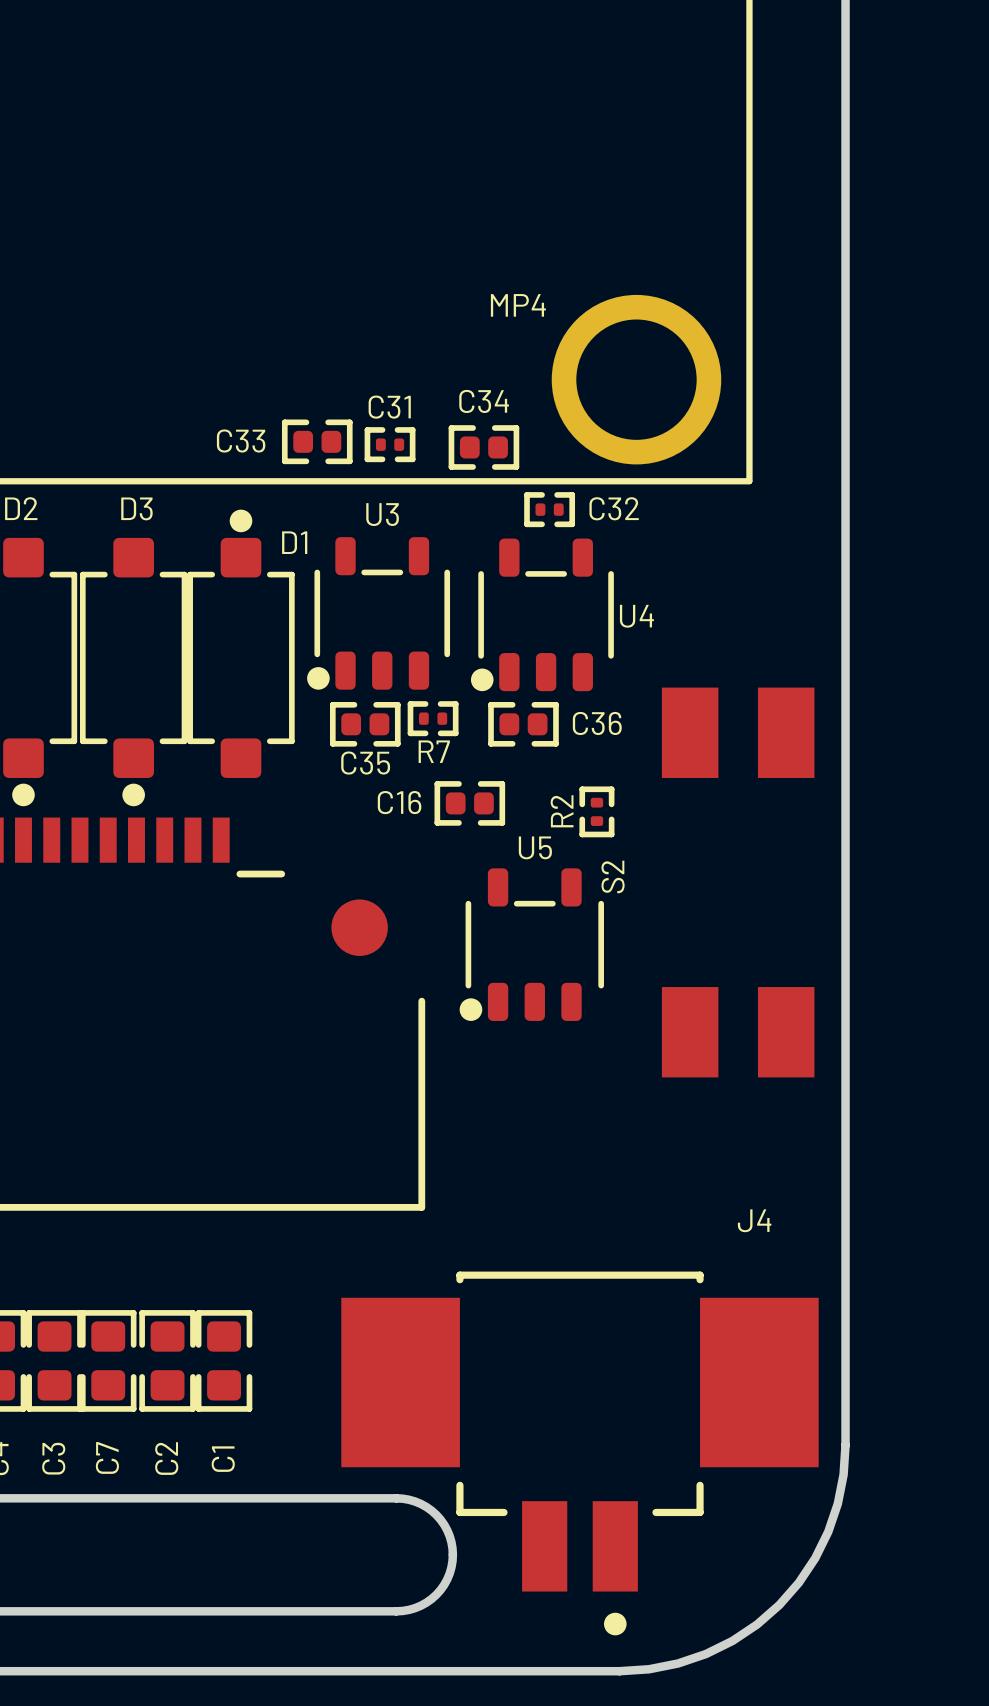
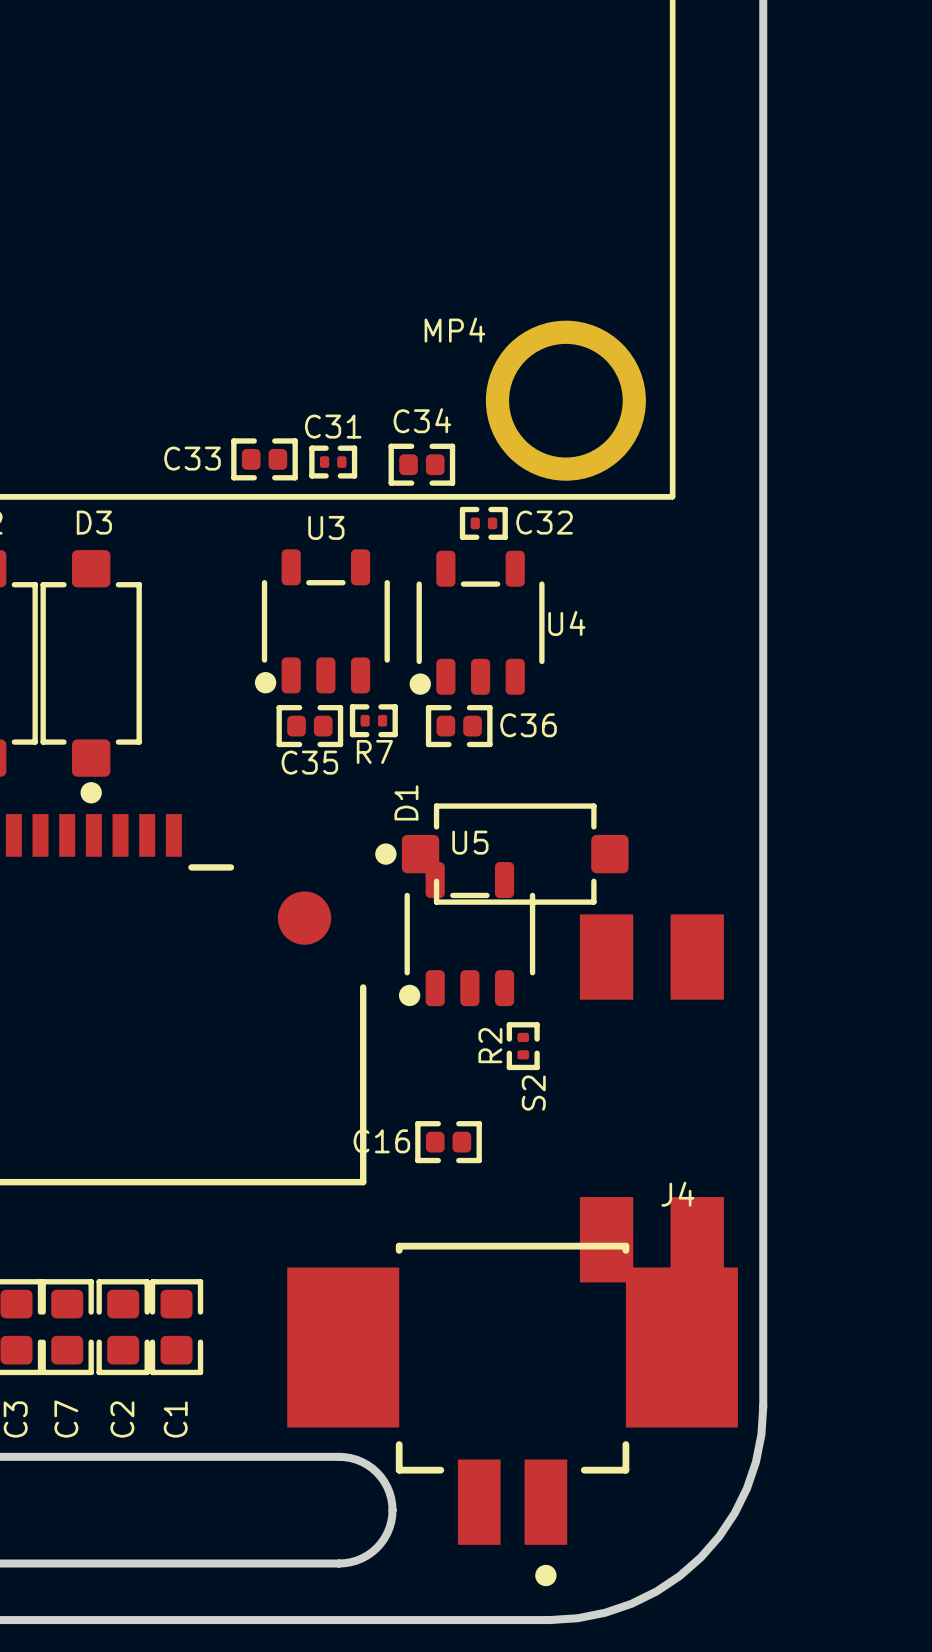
D1 rotation: 0° (241, 643) -> 90° counterclockwise (501, 854)
D1 position: (241, 643) -> (501, 854)
C16 position: (469, 803) -> (448, 1142)
R2 position: (596, 811) -> (523, 1046)
S2 position: (738, 882) -> (651, 1098)

